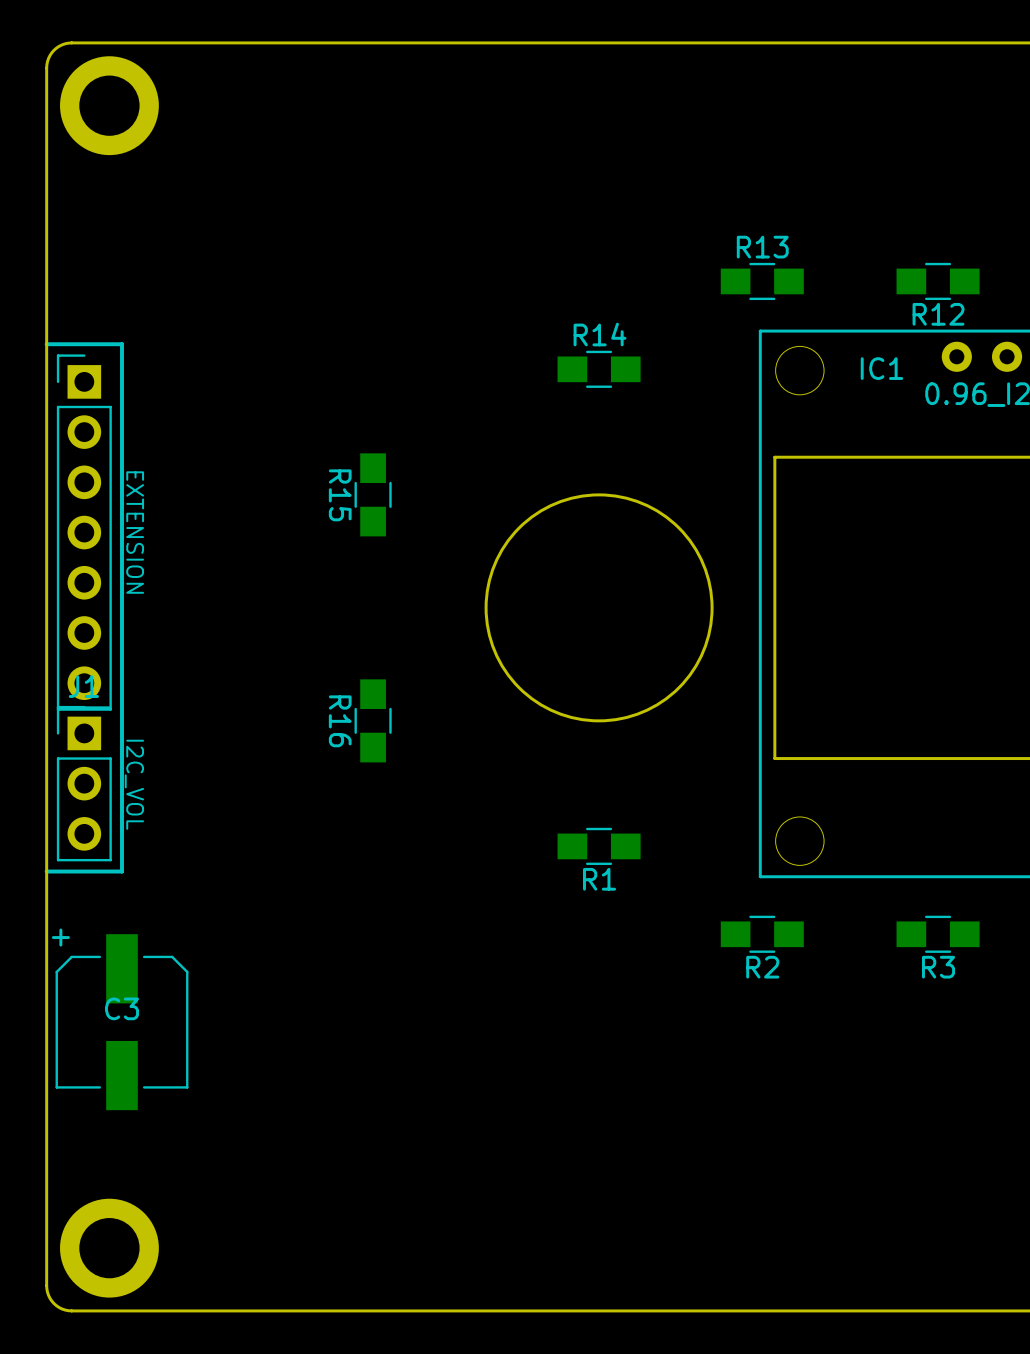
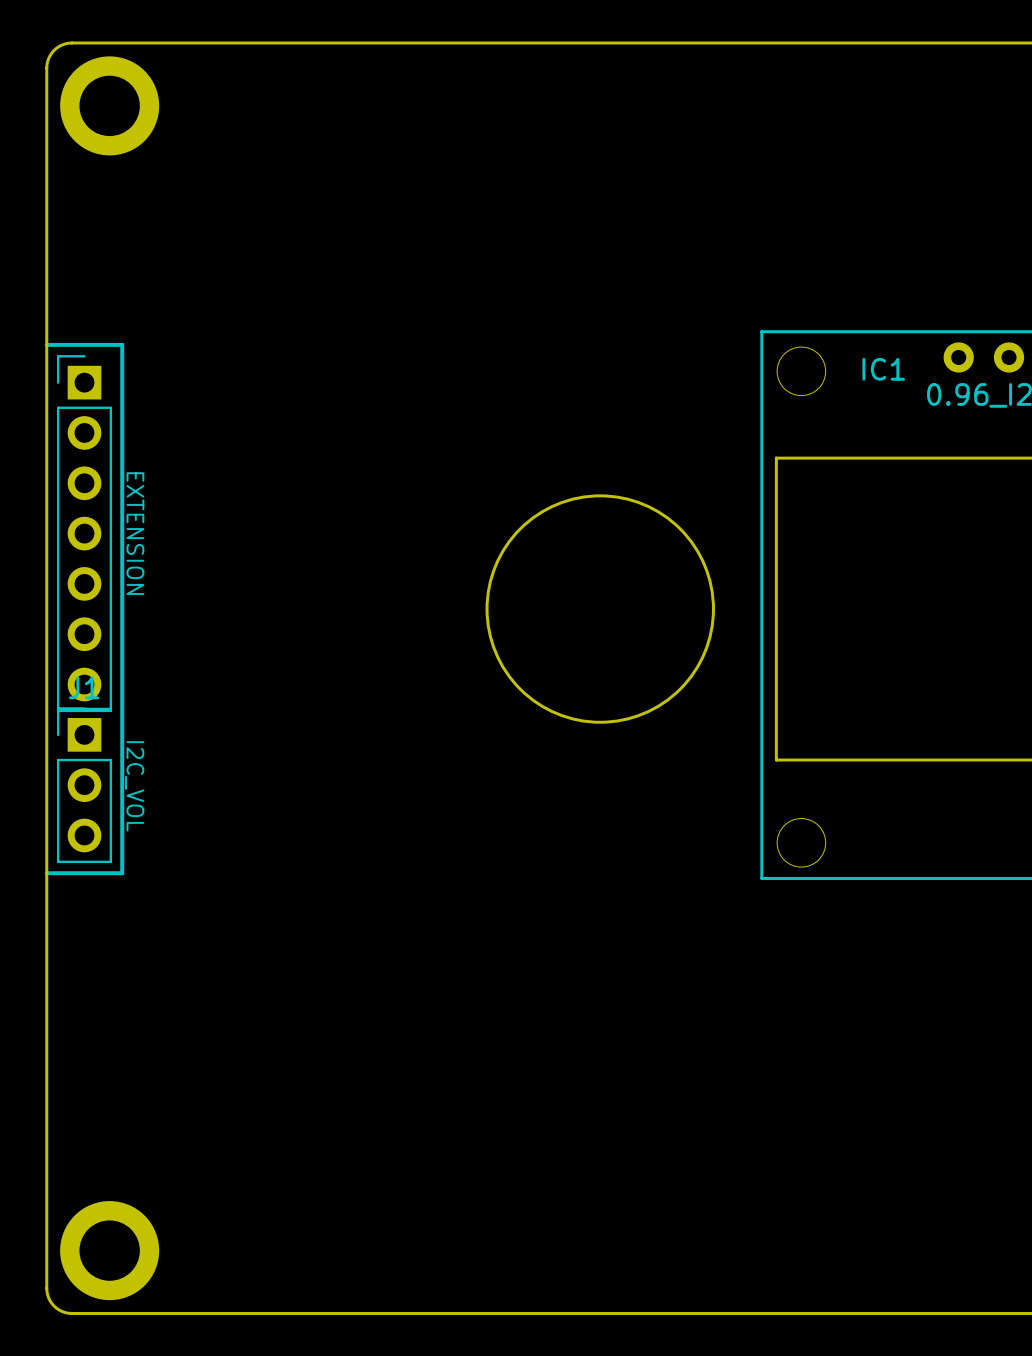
R13: (762, 281) -> none
R12: (938, 281) -> none
R14: (599, 369) -> none
R15: (373, 494) -> none
R16: (373, 720) -> none
R1: (599, 846) -> none
R2: (762, 934) -> none
R3: (938, 934) -> none
C3: (121, 1022) -> none

